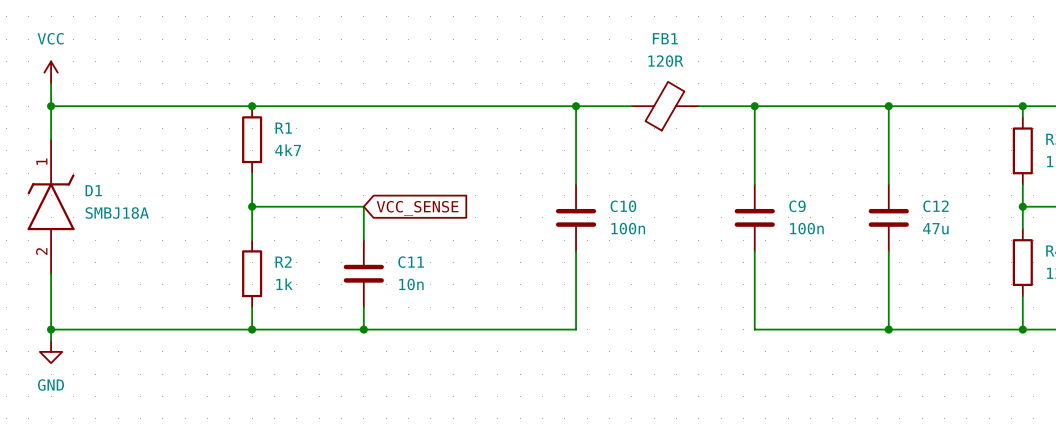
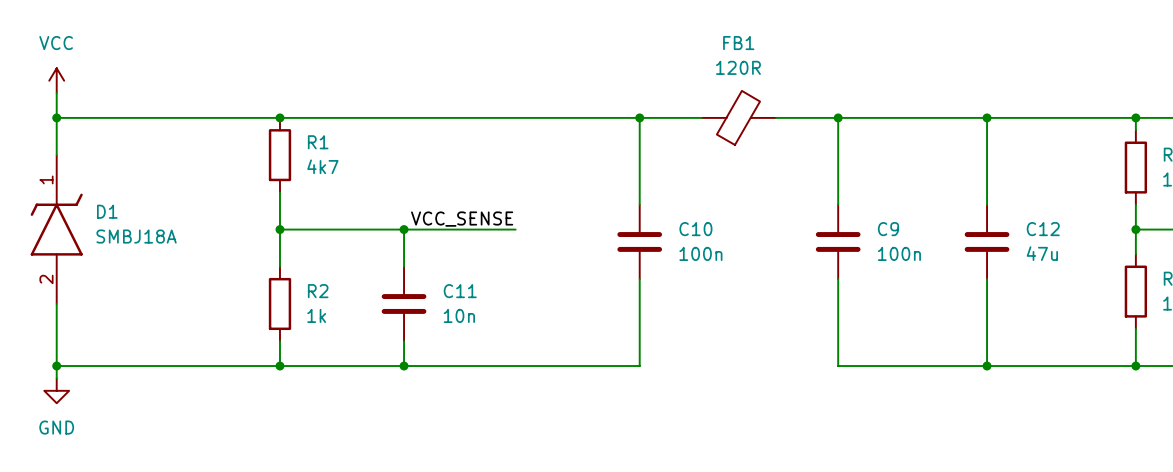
label: none -> VCC_SENSE (462, 219)
wire: none -> (404, 229) (515, 229)
junction: none -> (404, 229)
global label: VCC_SENSE (417, 208) -> none

